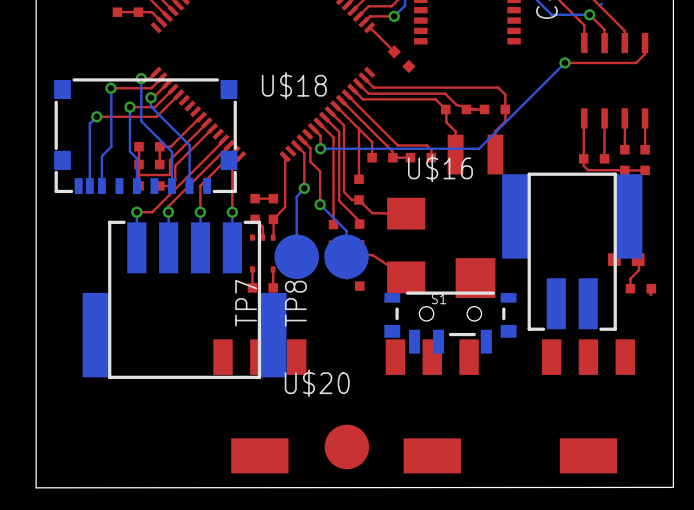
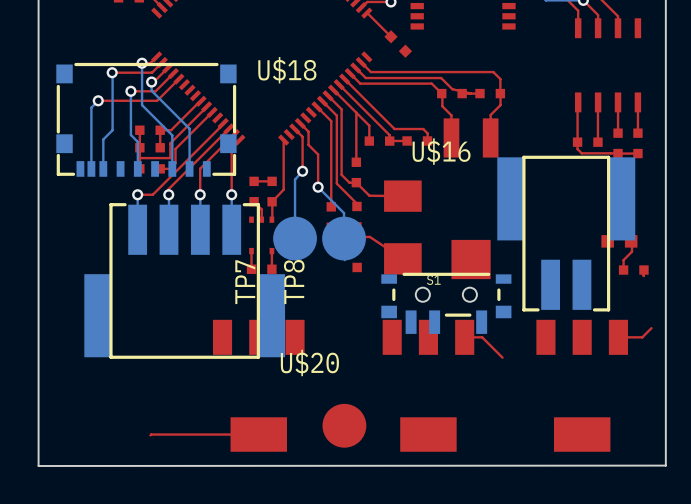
top track: (645, 43) (645, 54) (636, 62) (564, 62) -> none
bottom track: (564, 62) (479, 148) (320, 148) -> none
via: (564, 62) -> none
top track: (313, 128) (320, 135) (320, 148) -> none
via: (320, 148) -> none
top track: none -> (651, 328) (642, 337) (618, 337)
top track: none -> (464, 337) (482, 337) (502, 357)
top track: none -> (258, 434) (150, 435)

